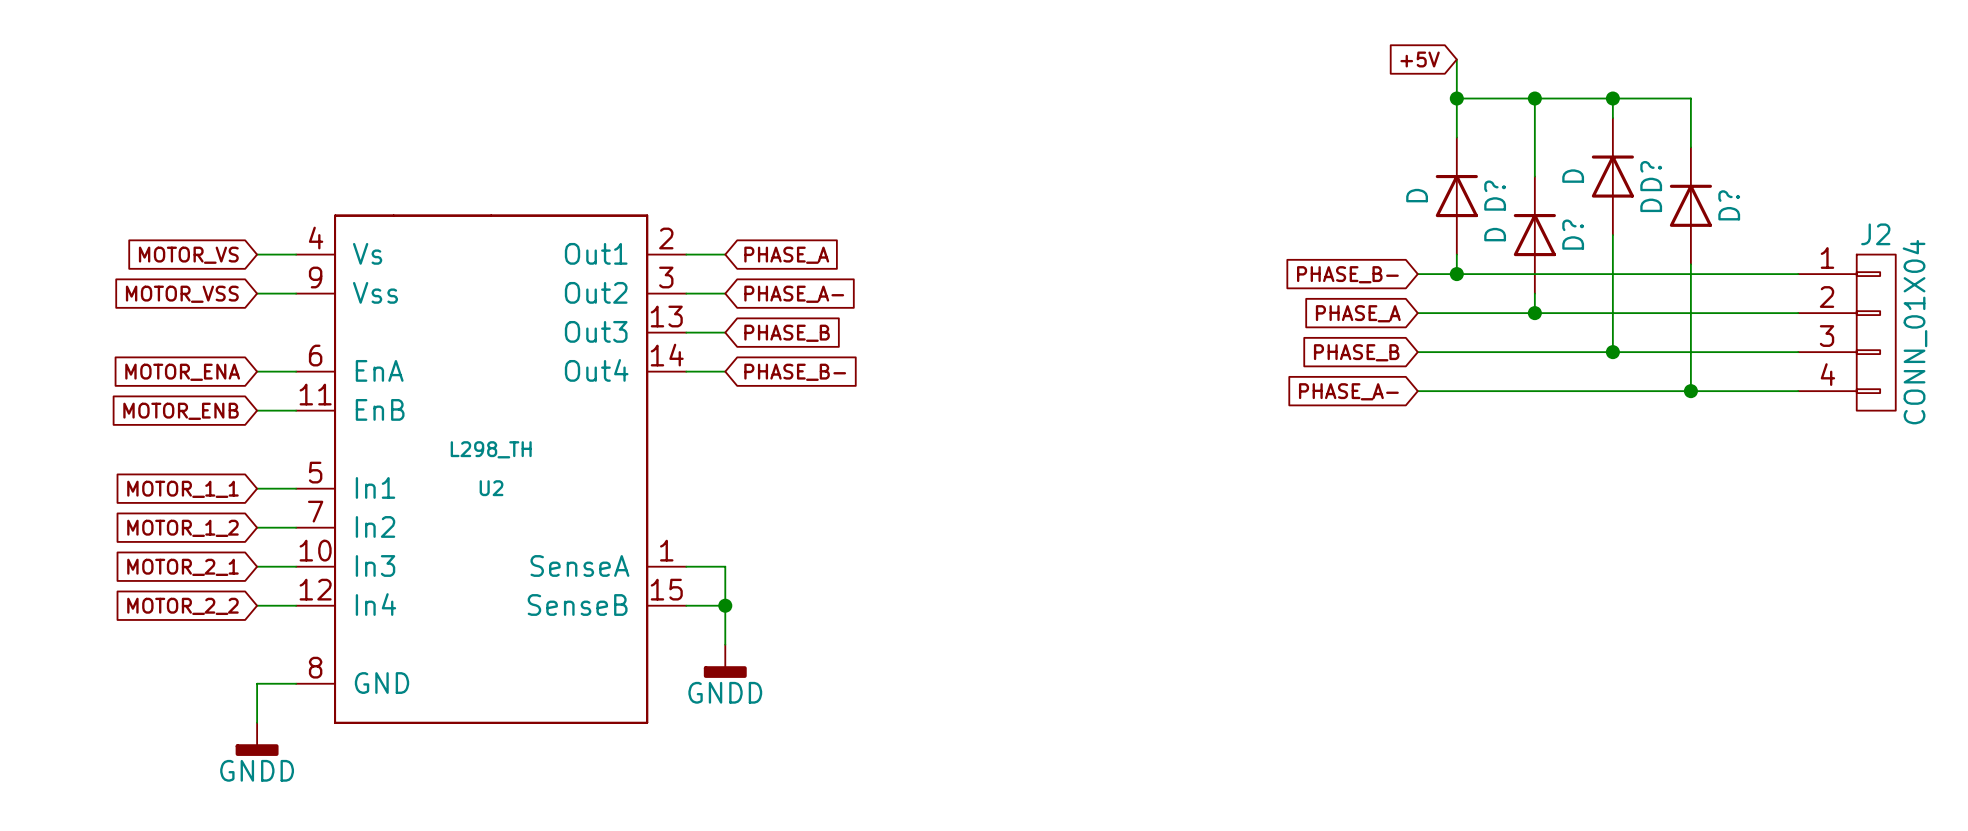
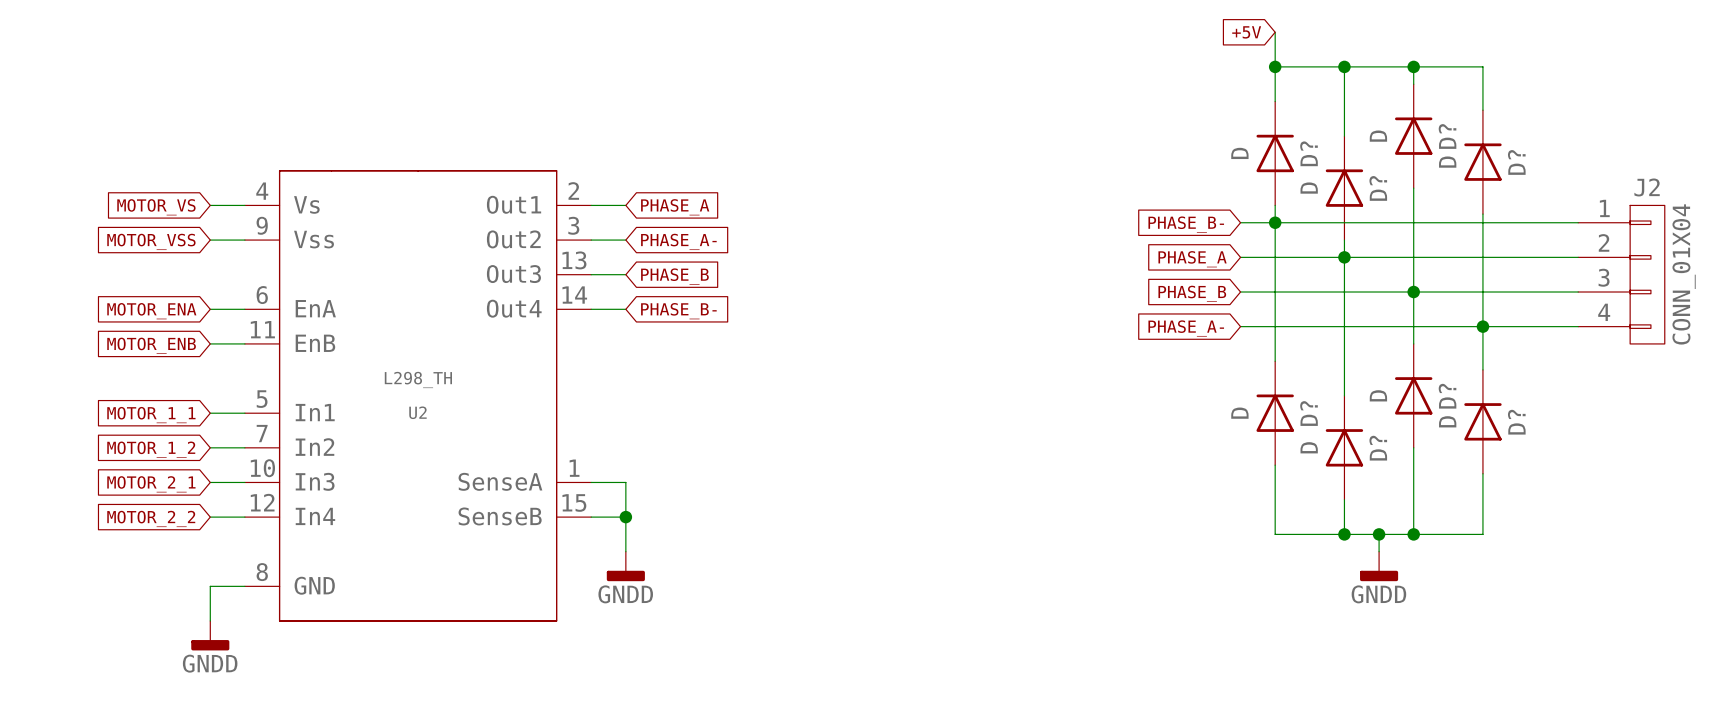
wire: none -> (1275, 222) (1275, 361)
wire: none -> (1344, 257) (1344, 395)
wire: none -> (1413, 292) (1413, 343)
wire: none -> (1482, 326) (1482, 369)
D?: none -> D (1413, 395)
D?: none -> D (1275, 413)
D?: none -> D (1482, 421)
D?: none -> D (1344, 447)
wire: none -> (1413, 447) (1413, 534)
wire: none -> (1275, 465) (1275, 534) (1482, 534) (1482, 473)
wire: none -> (1344, 499) (1344, 534)
junction: none -> (1344, 534)
wire: none -> (1379, 534) (1379, 551)
junction: none -> (1379, 534)
junction: none -> (1413, 534)
power symbol: none -> GNDD (1379, 566)

